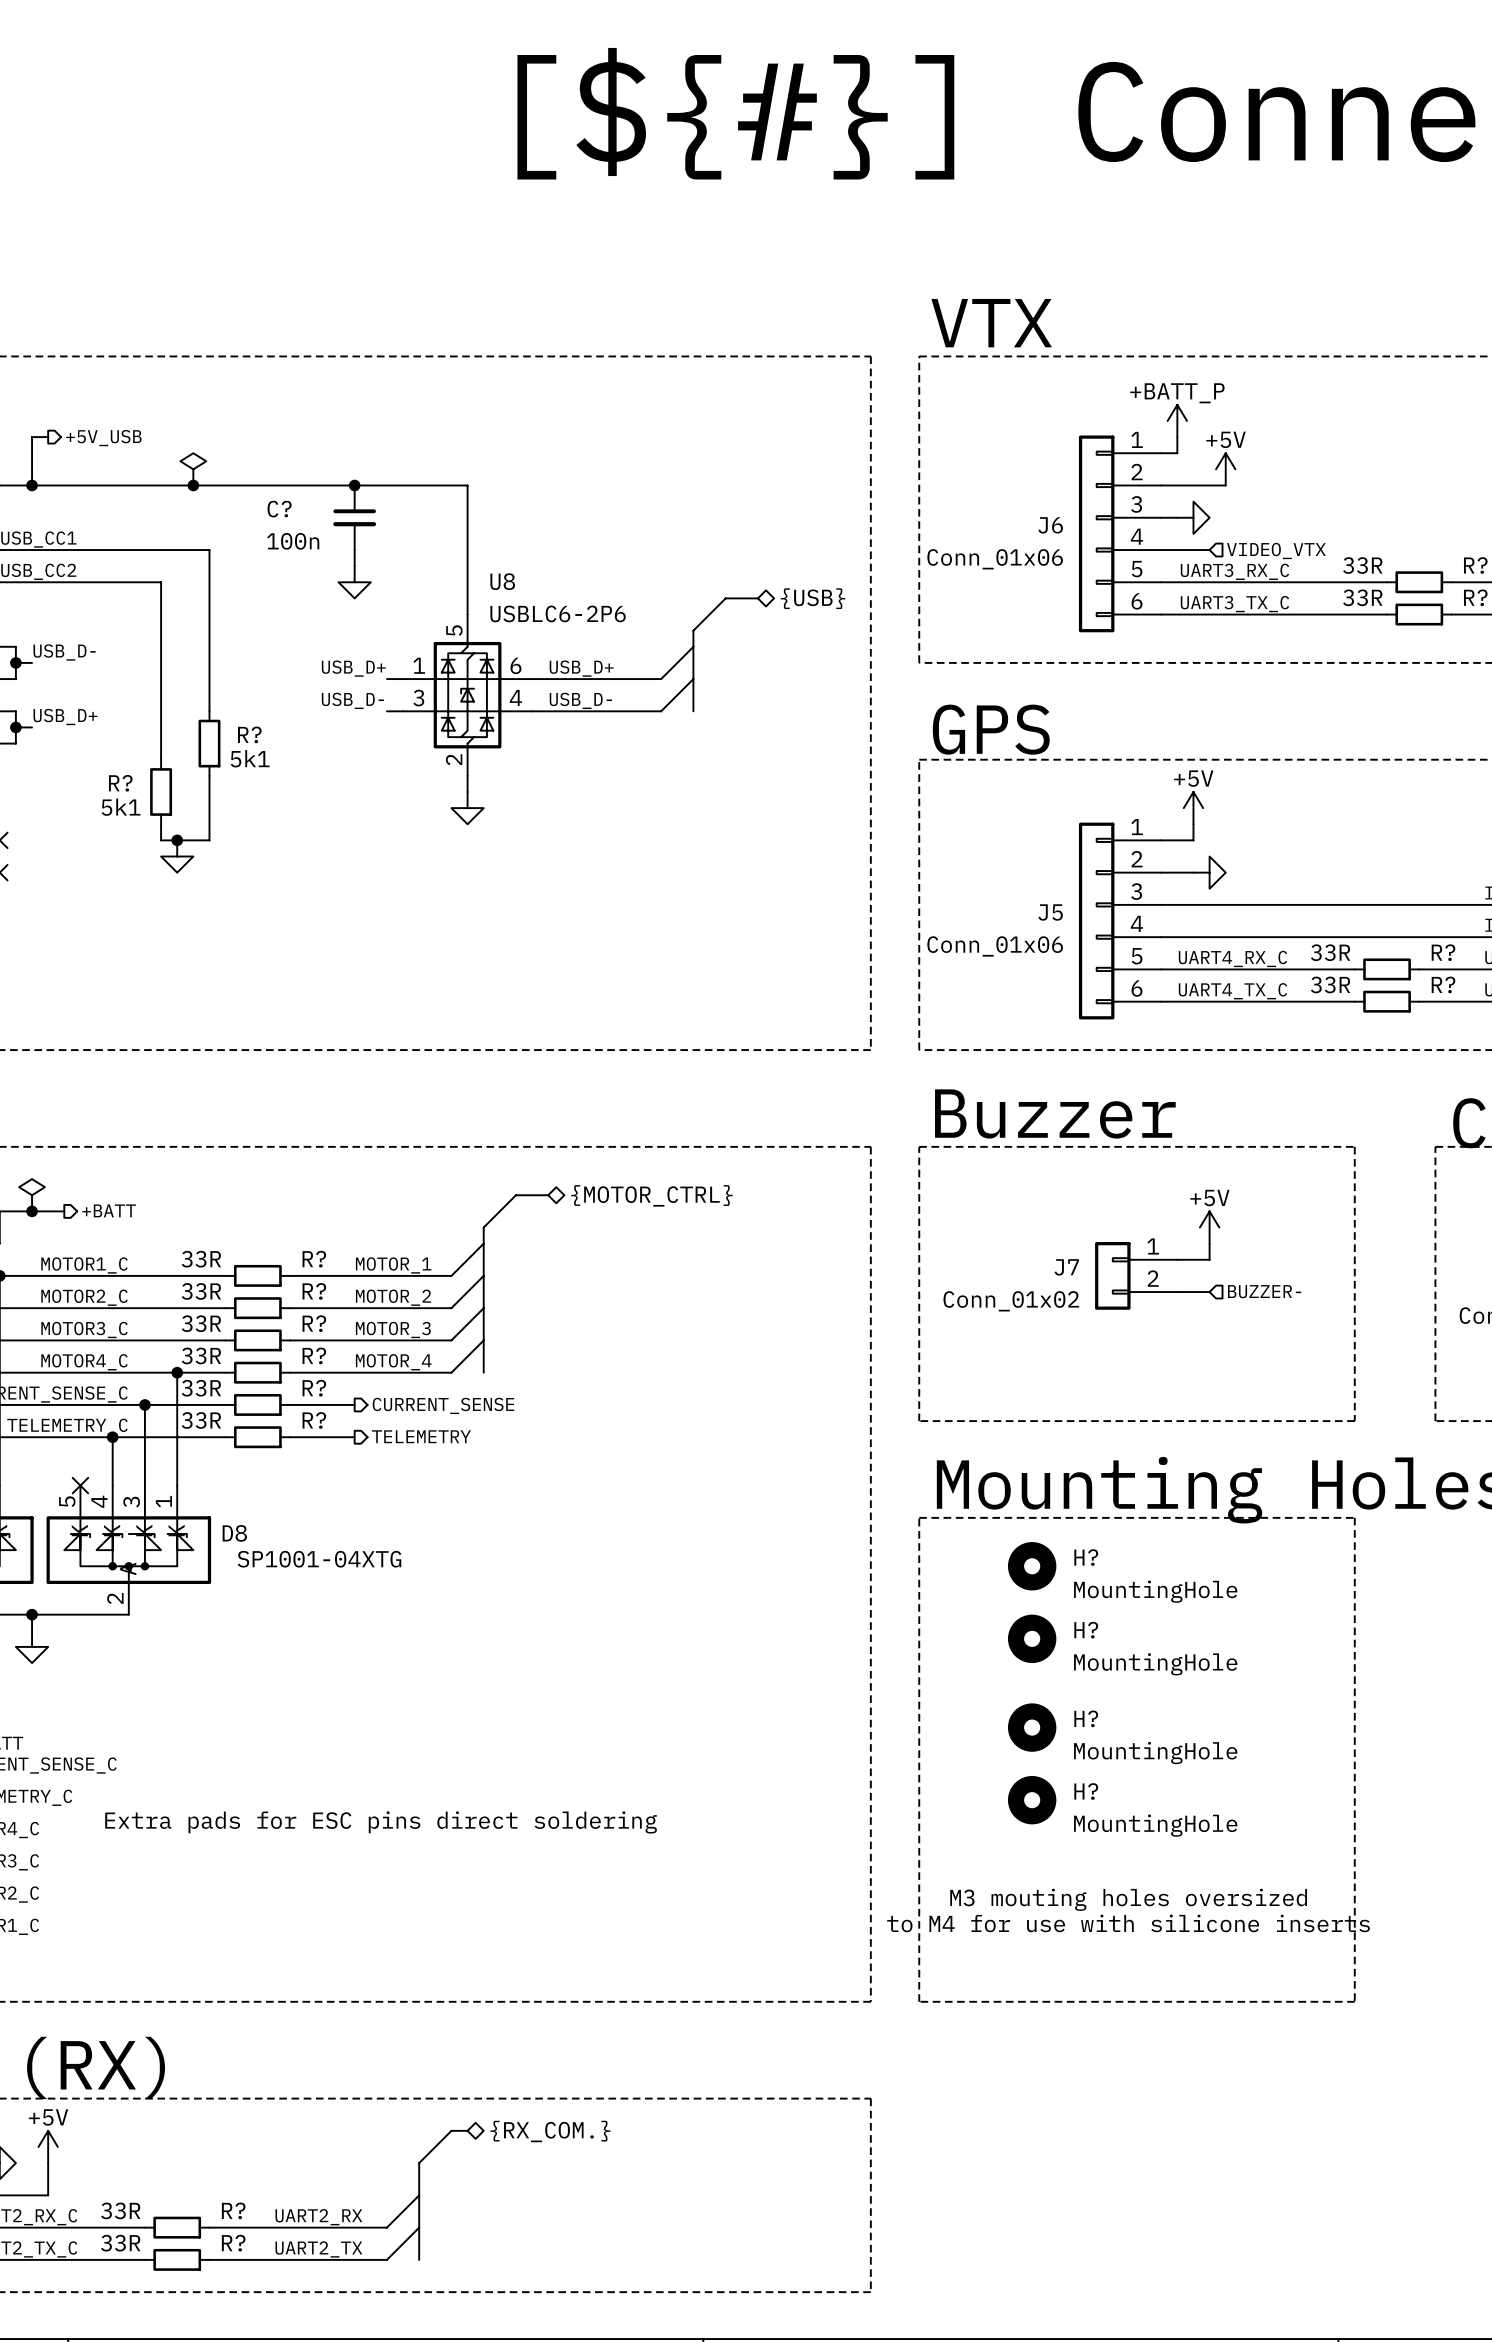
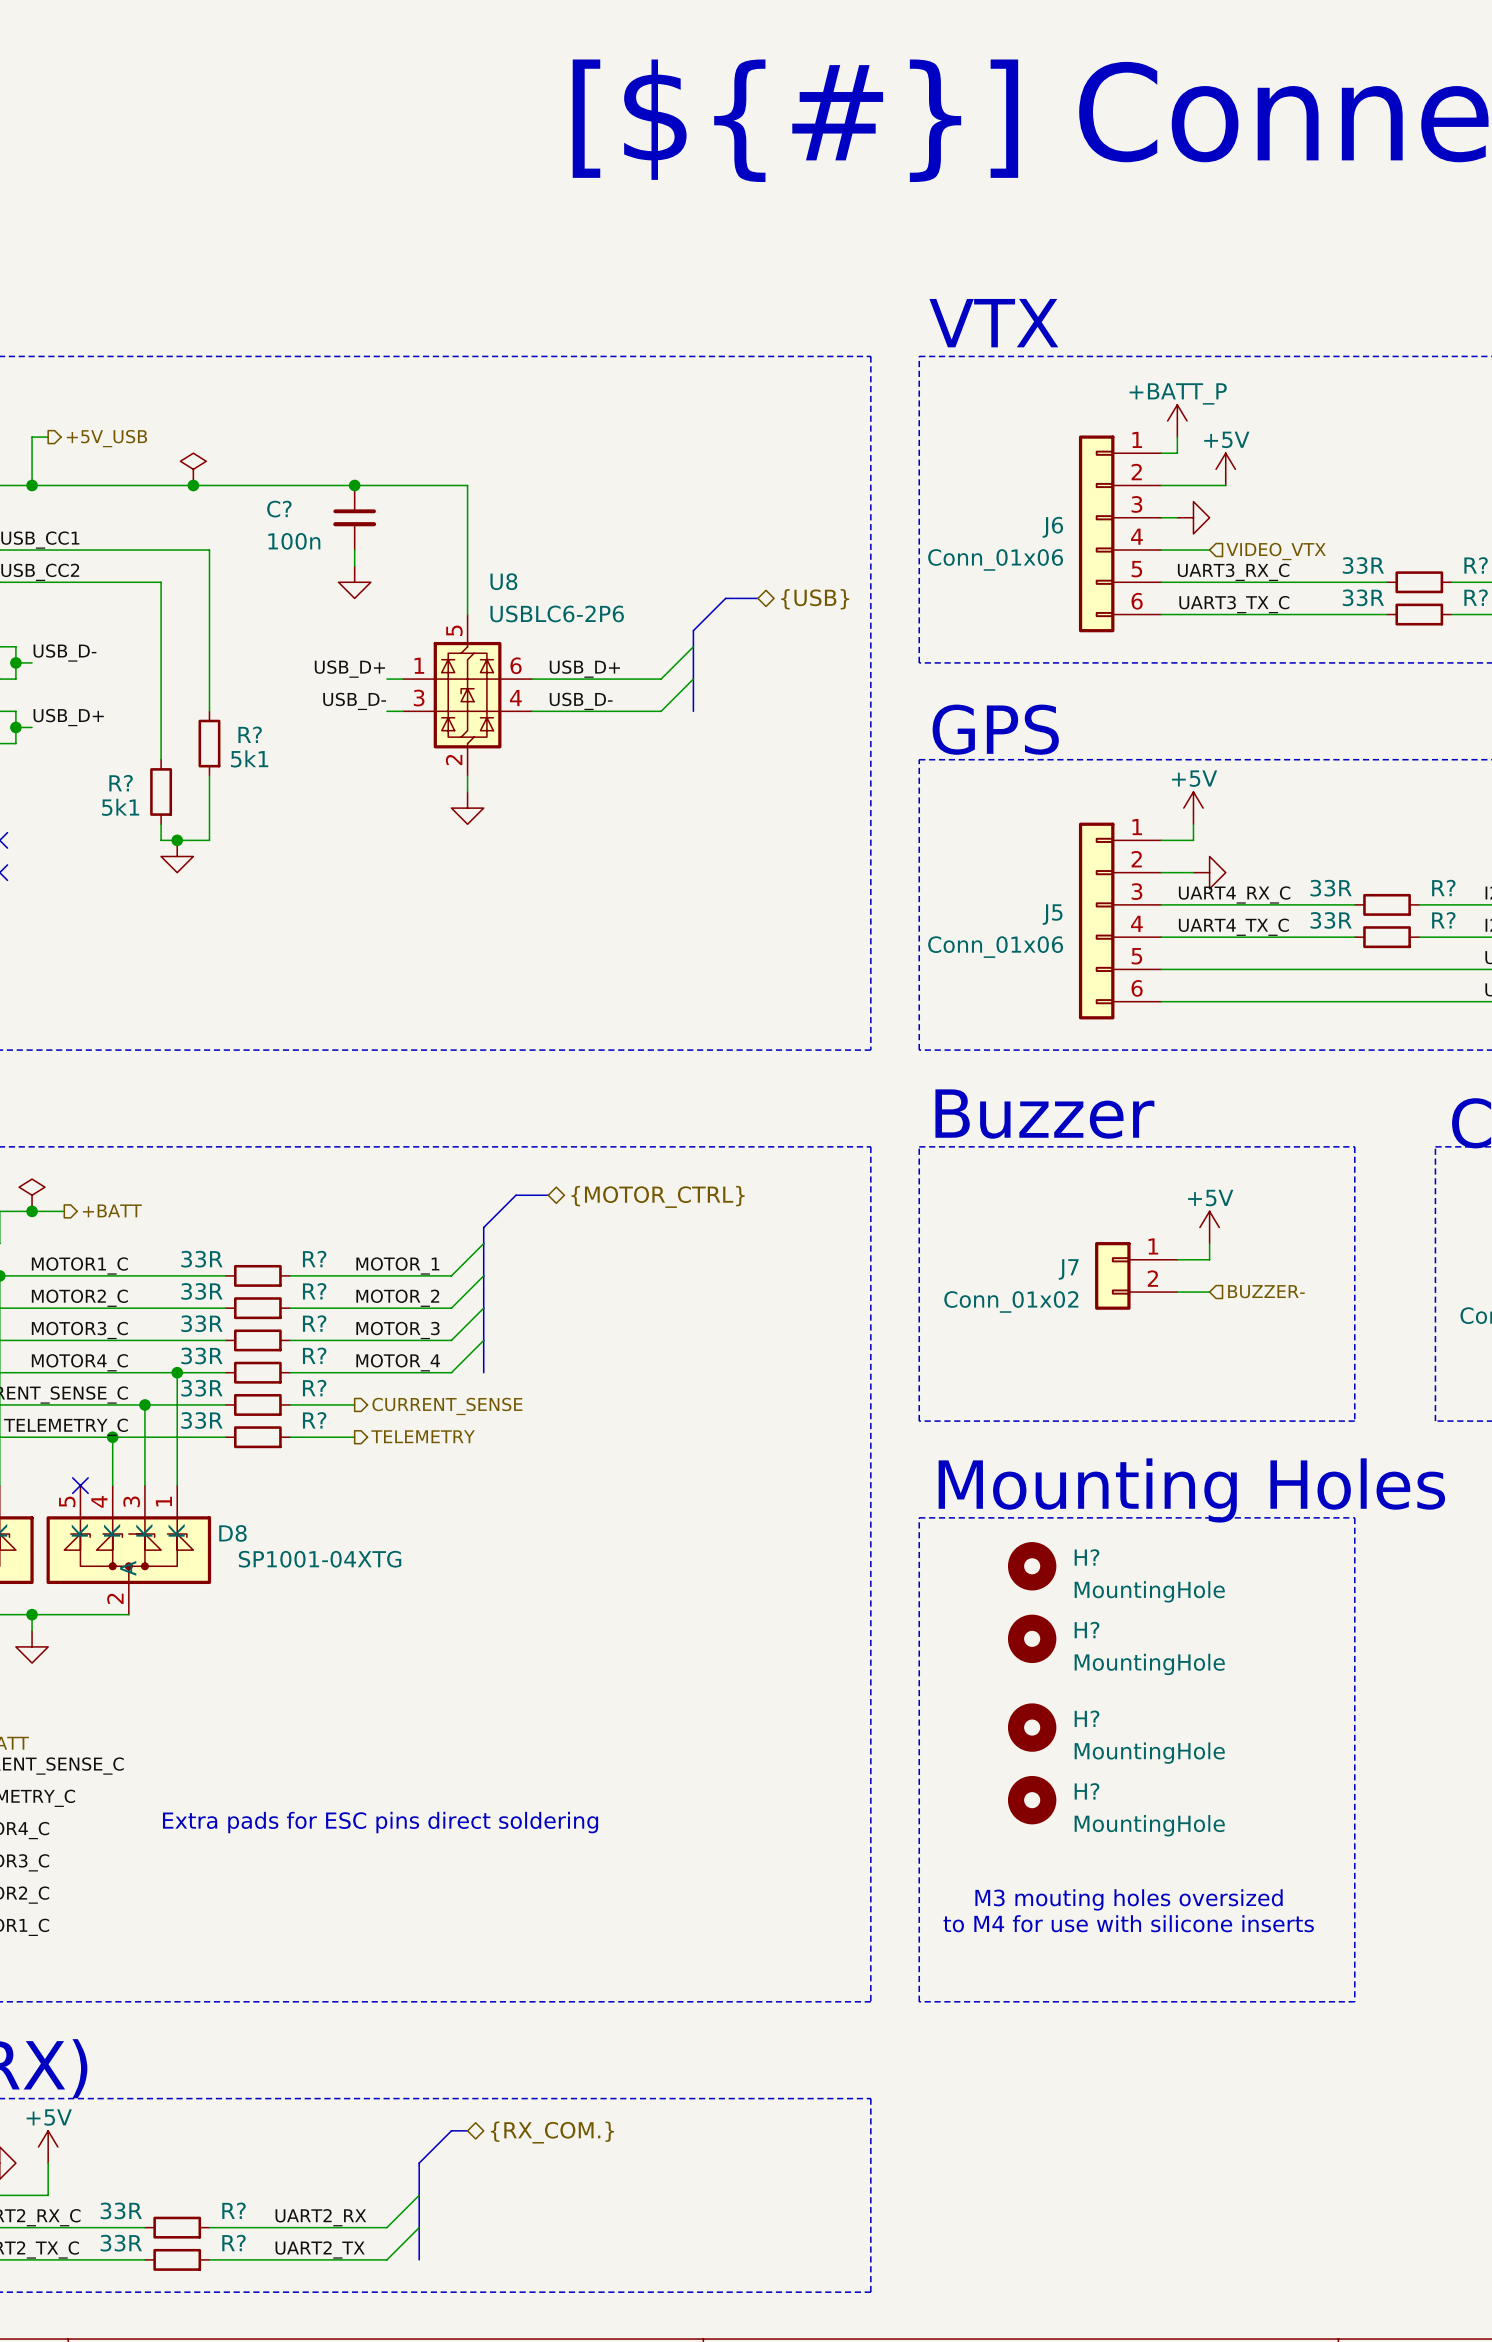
wire: (1354, 904) (1419, 904) -> (1354, 969) (1419, 969)
R?: none -> 33R (1387, 904)
wire: (1354, 937) (1419, 937) -> (1354, 1001) (1419, 1001)
R?: none -> 33R (1387, 937)
label position: UART4_RX_C (1232, 958) -> UART4_RX_C (1234, 894)
R?: 33R (1387, 969) -> none
label position: UART4_TX_C (1232, 991) -> UART4_TX_C (1233, 927)
R?: 33R (1387, 1001) -> none

